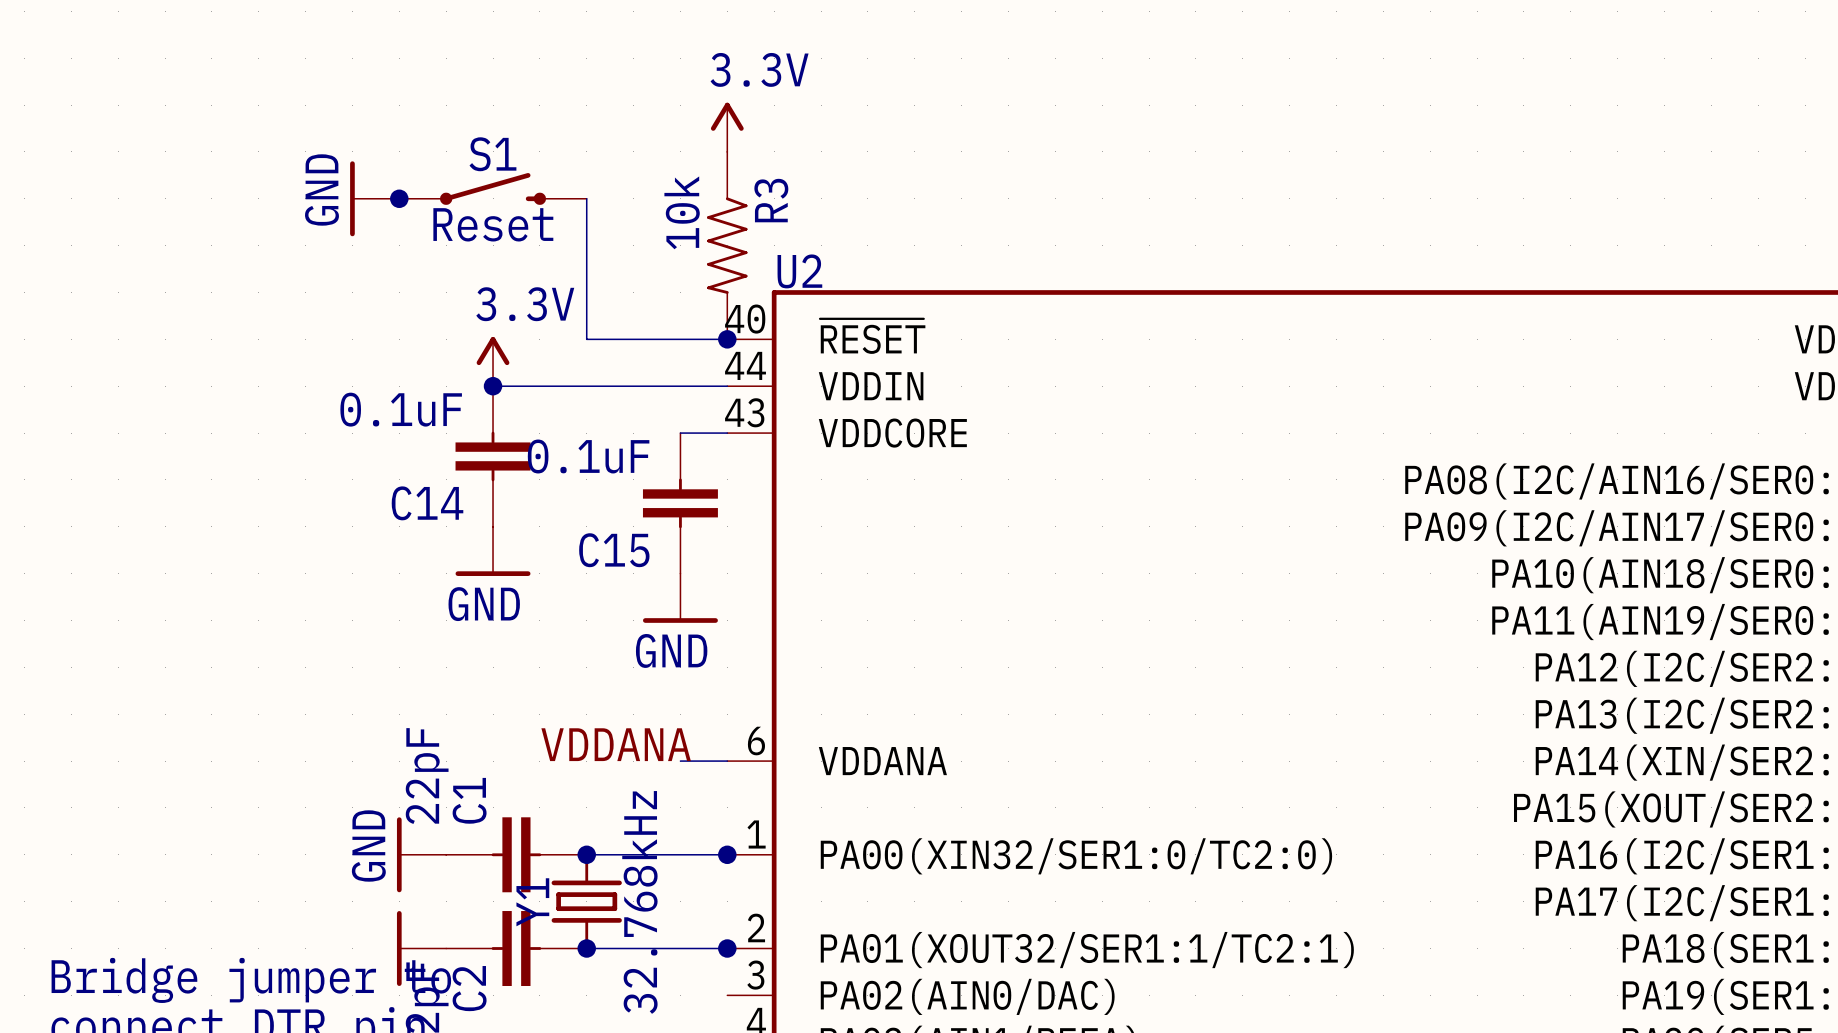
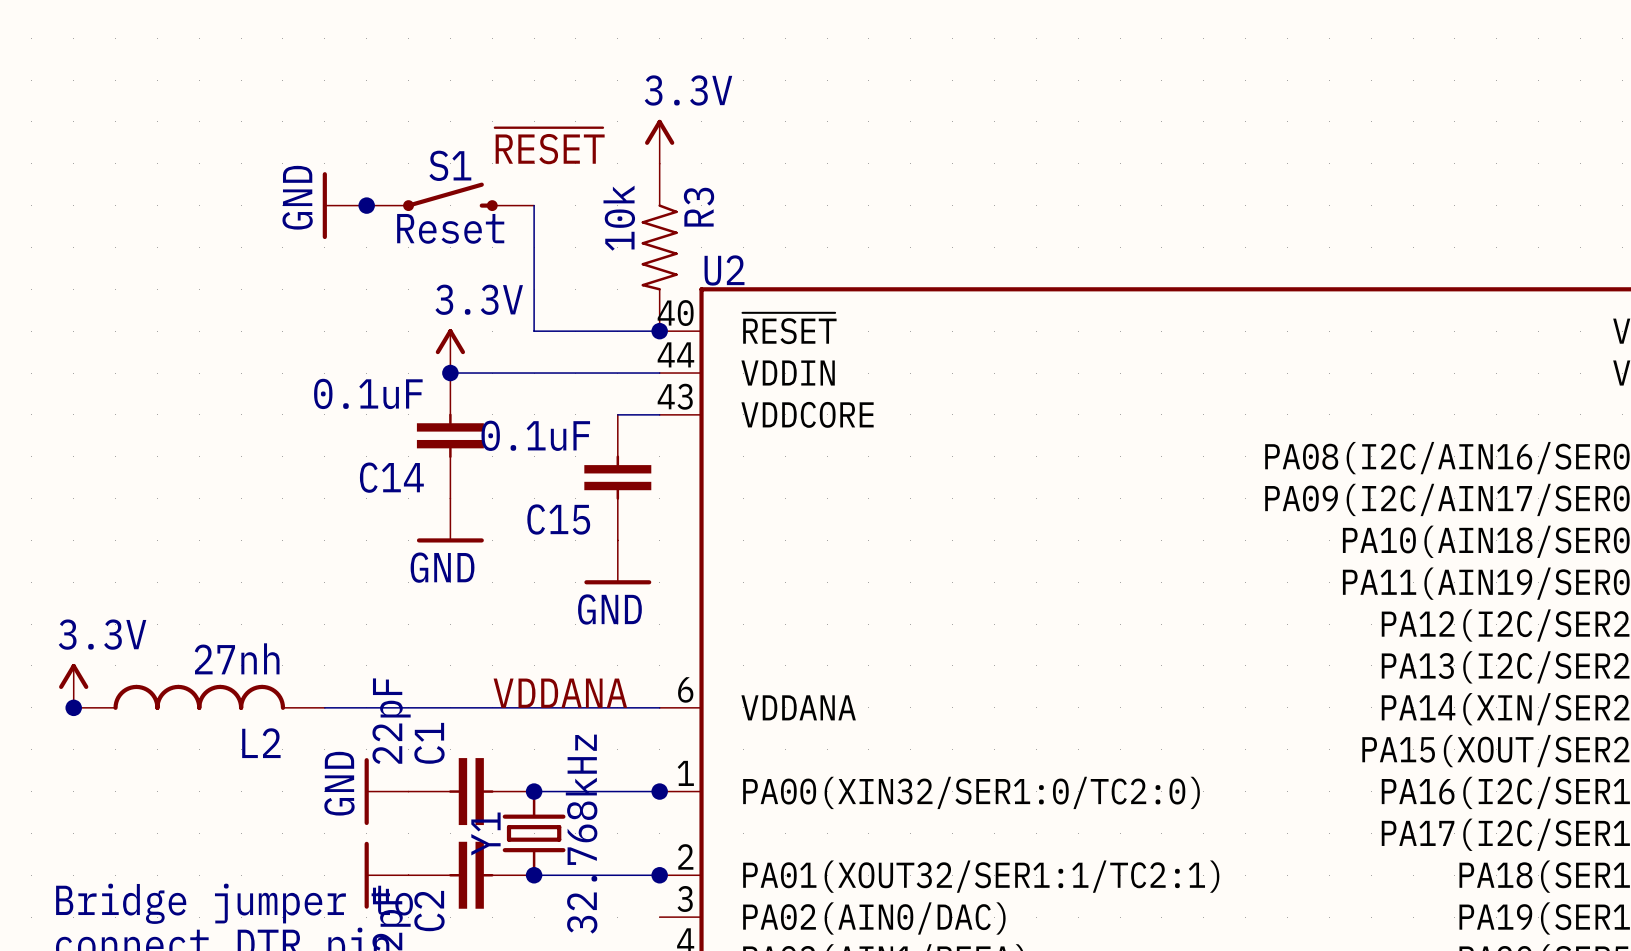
label: none -> ~{RESET} (549, 145)
power symbol: none -> 3.3V (73, 685)
L2: none -> 27nh (199, 697)
junction: none -> (73, 707)
wire: none -> (324, 707) (617, 707)

